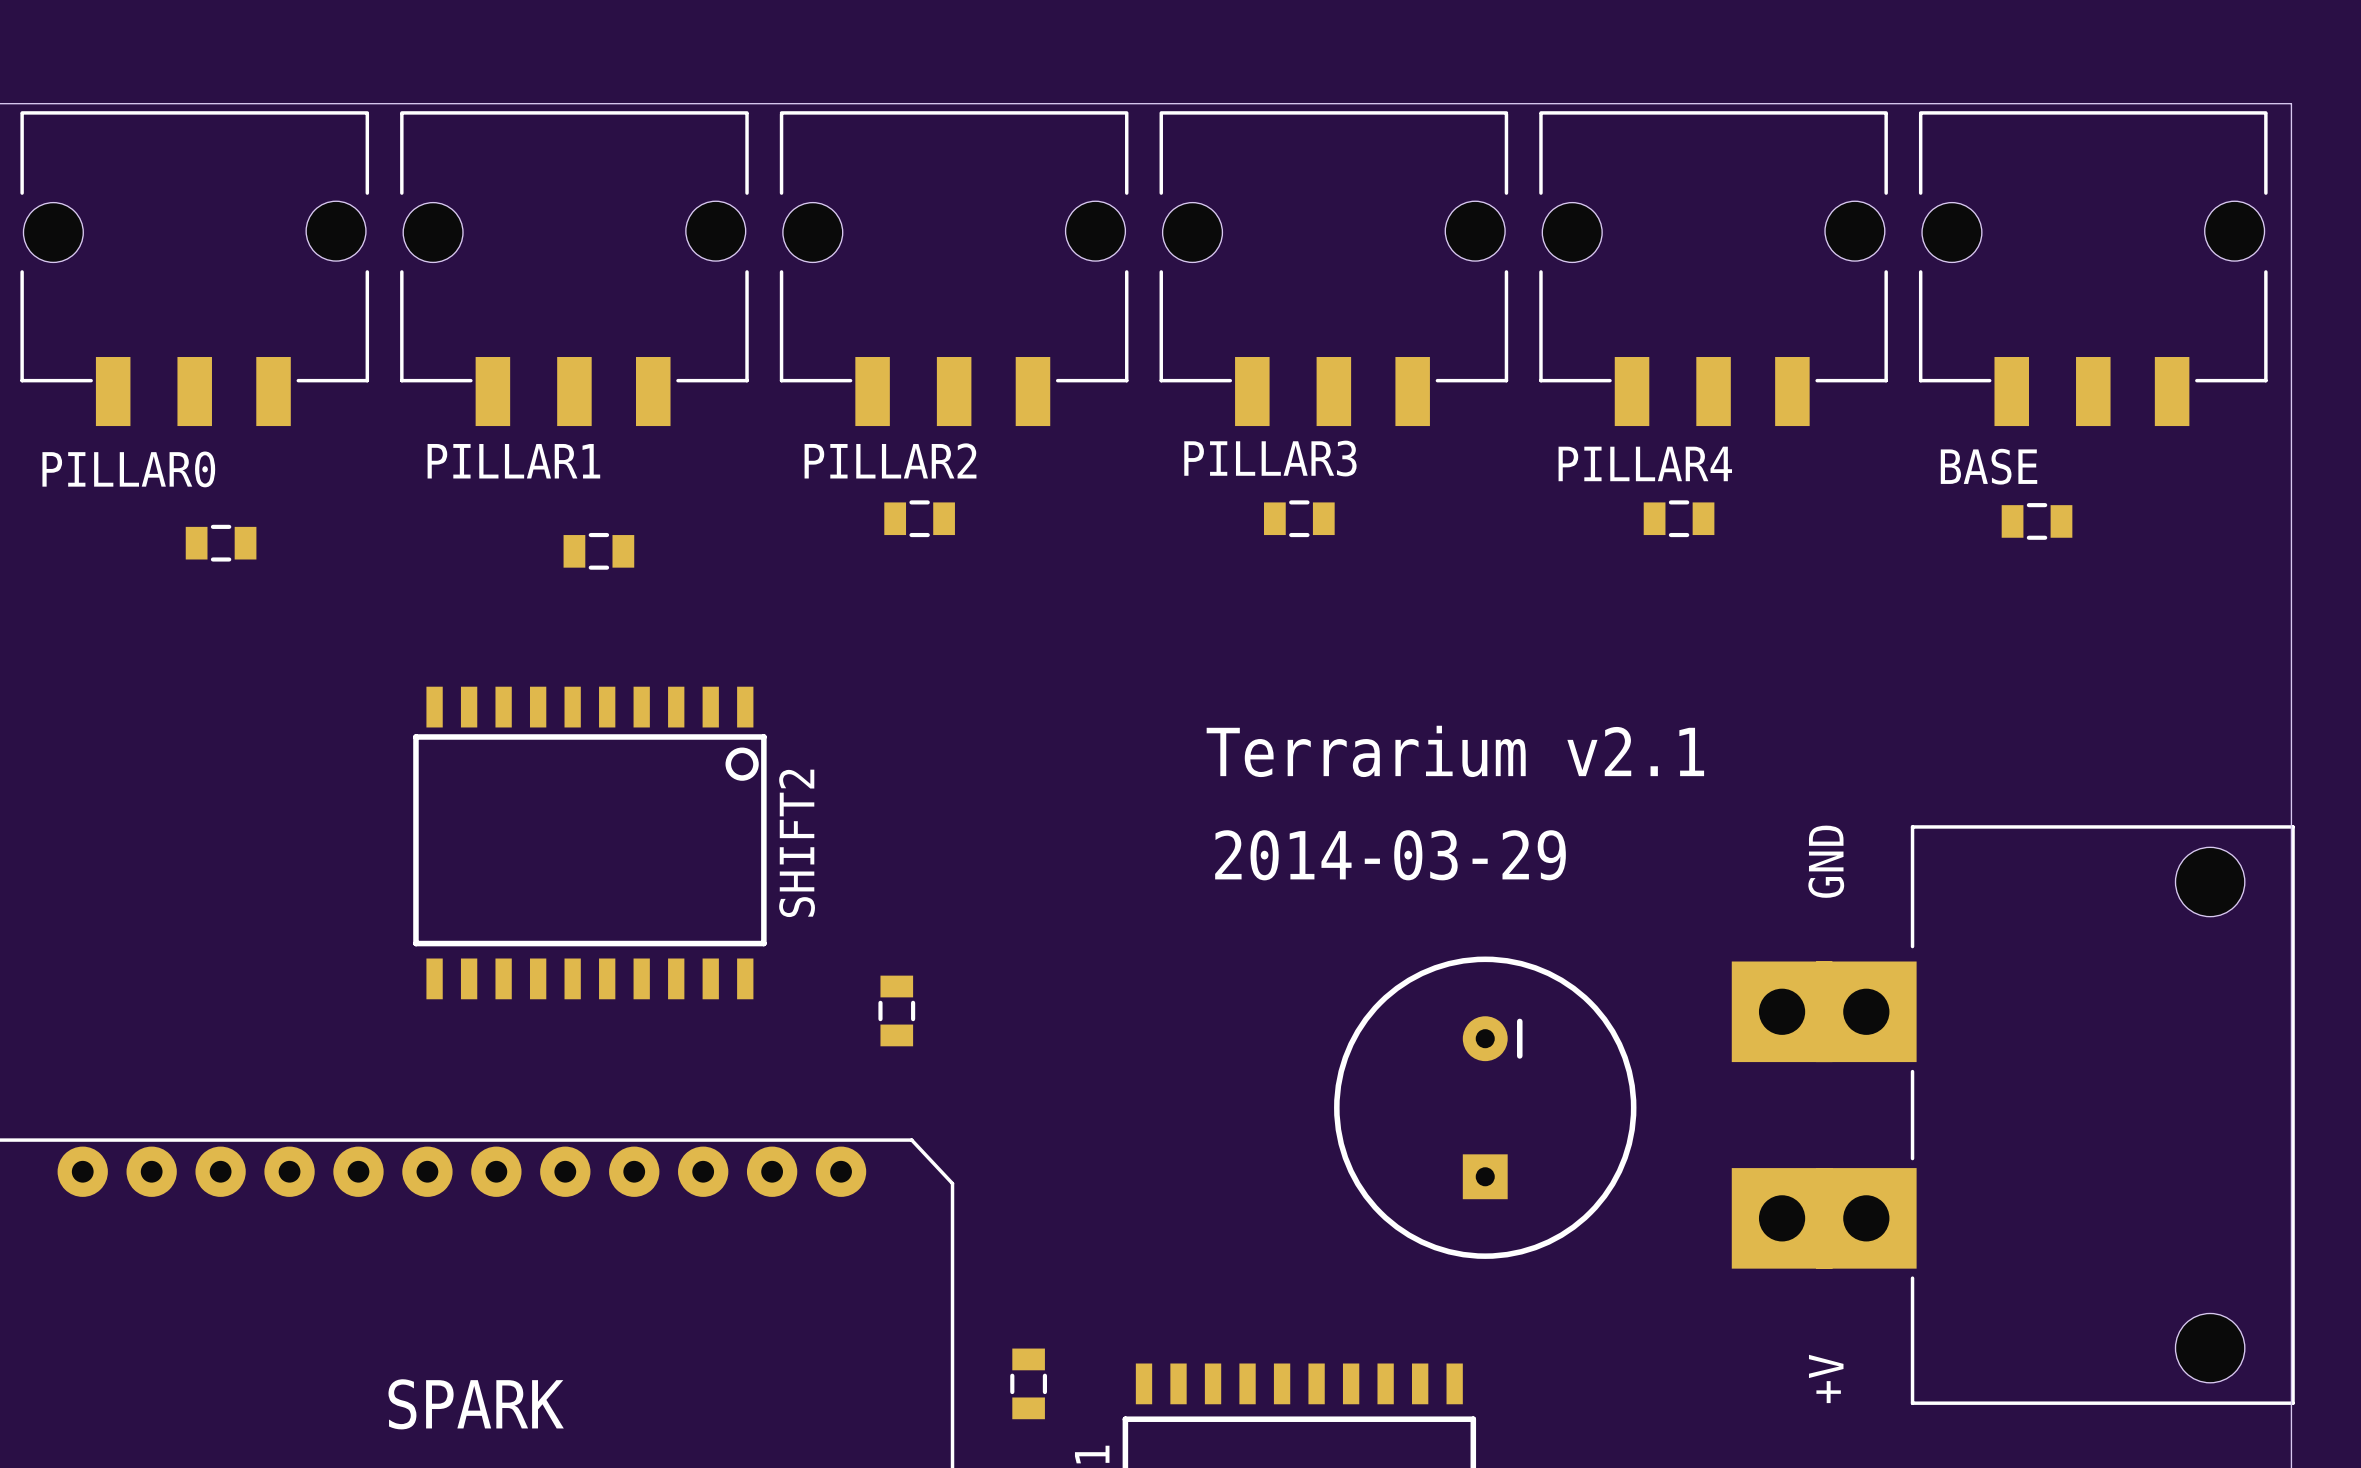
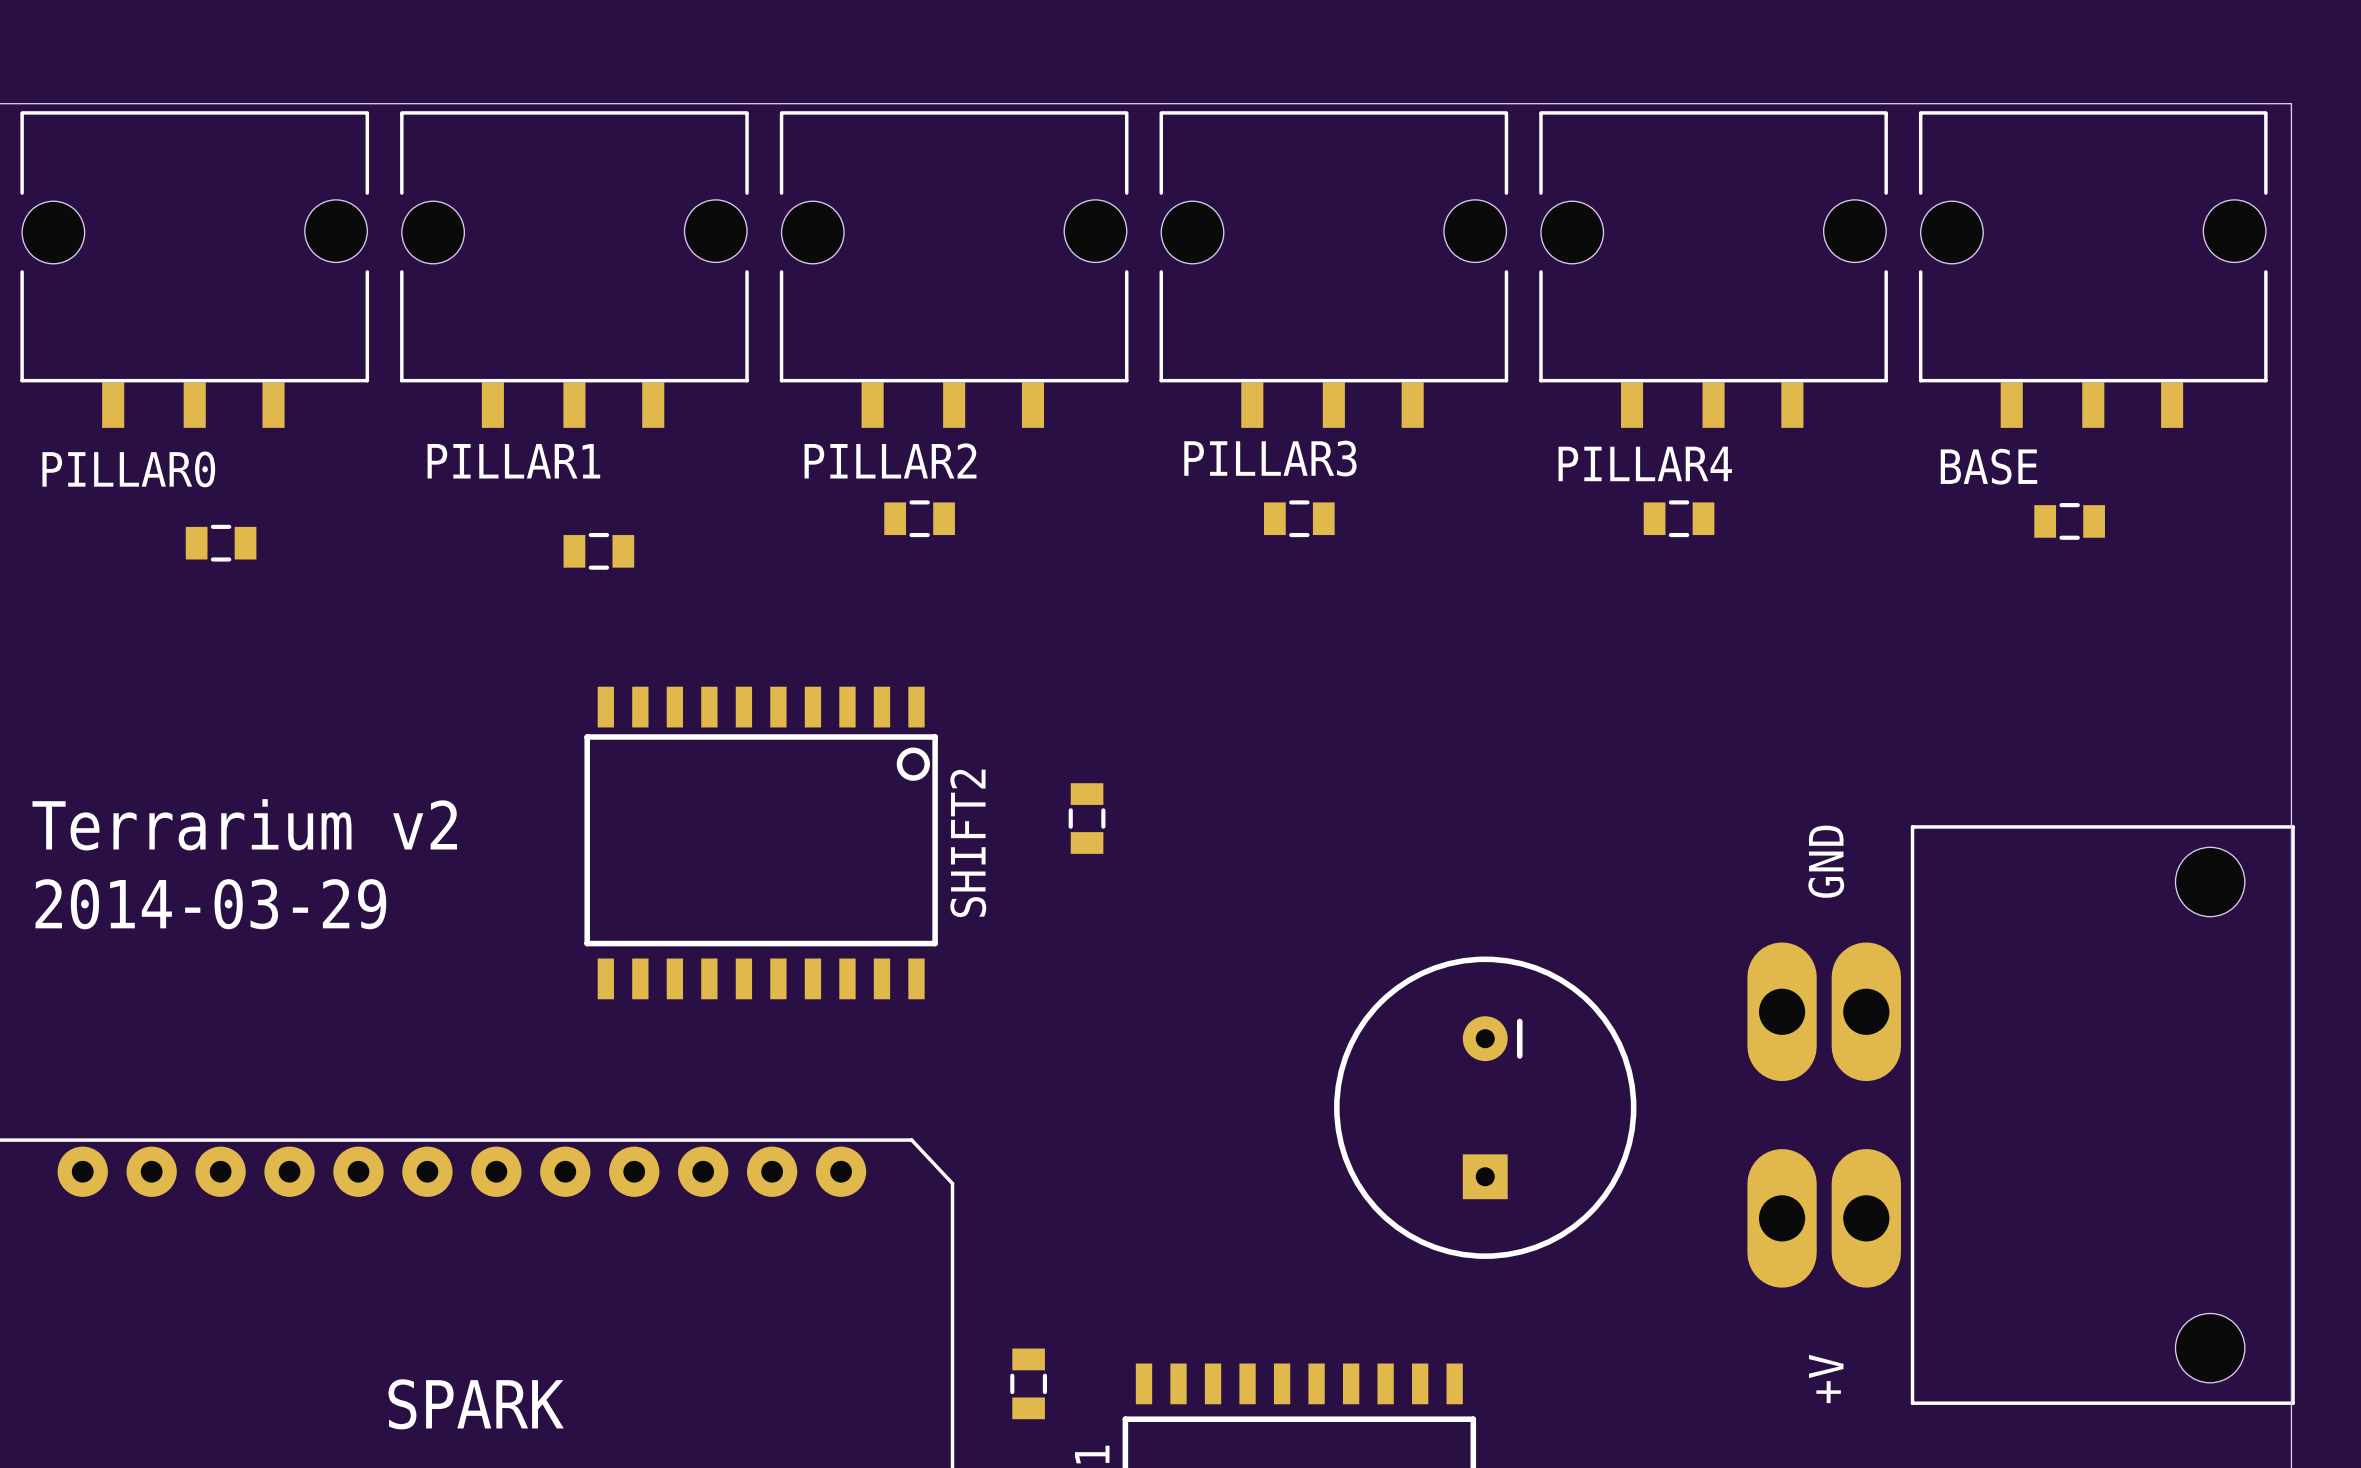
PILLAR0 footprint: [20, 111, 370, 427] -> [20, 111, 370, 428]
PILLAR1 footprint: [400, 111, 749, 427] -> [400, 111, 749, 428]
PILLAR2 footprint: [779, 111, 1129, 427] -> [779, 111, 1129, 428]
PILLAR3 footprint: [1159, 111, 1509, 427] -> [1159, 111, 1509, 428]
PILLAR4 footprint: [1539, 111, 1888, 427] -> [1539, 111, 1888, 428]
BASE footprint: [1918, 111, 2268, 427] -> [1918, 111, 2268, 428]
part position: (2037, 521) -> (2069, 521)
text: Terrarium v2.1 (1455, 751) -> none
text: none -> Terrarium v2 (244, 824)
part footprint: [1731, 825, 2295, 1405] -> [1747, 825, 2295, 1405]
SHIFT2 position: (589, 842) -> (761, 842)
text: 2014-03-29 (1390, 855) -> none
text: none -> 2014-03-29 (210, 904)
part position: (896, 1010) -> (1087, 818)

